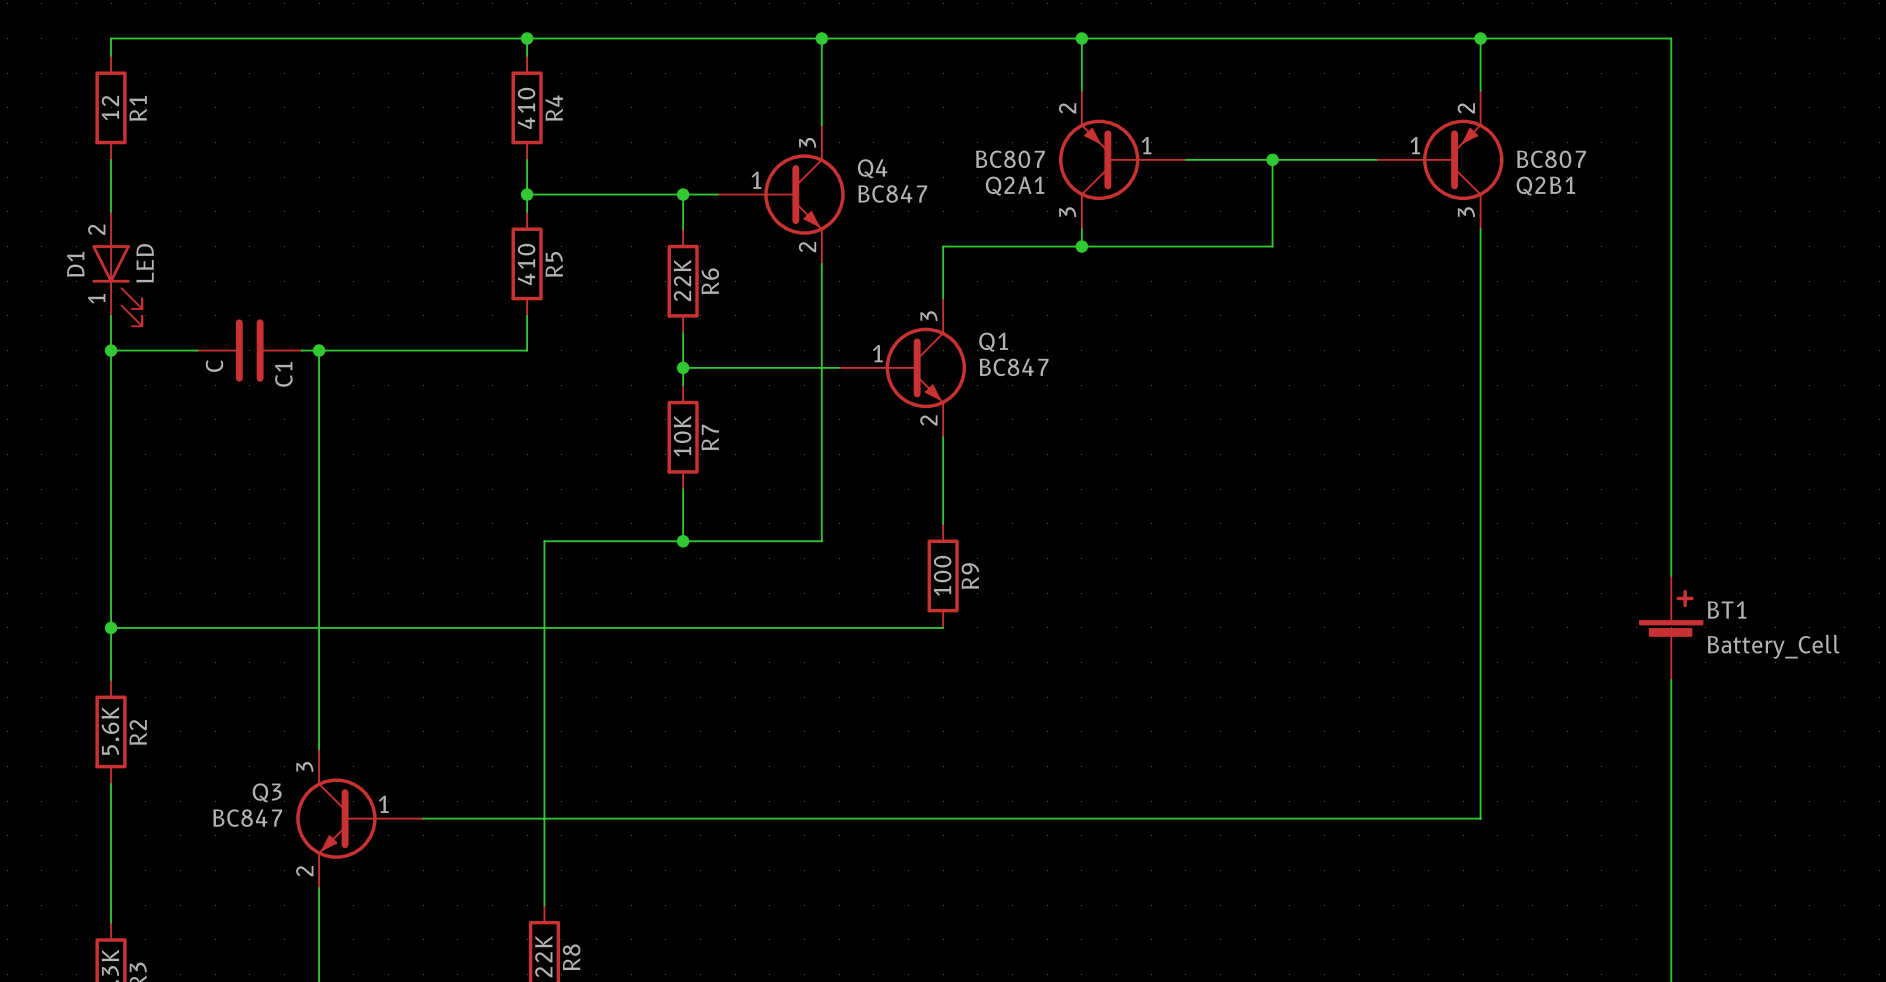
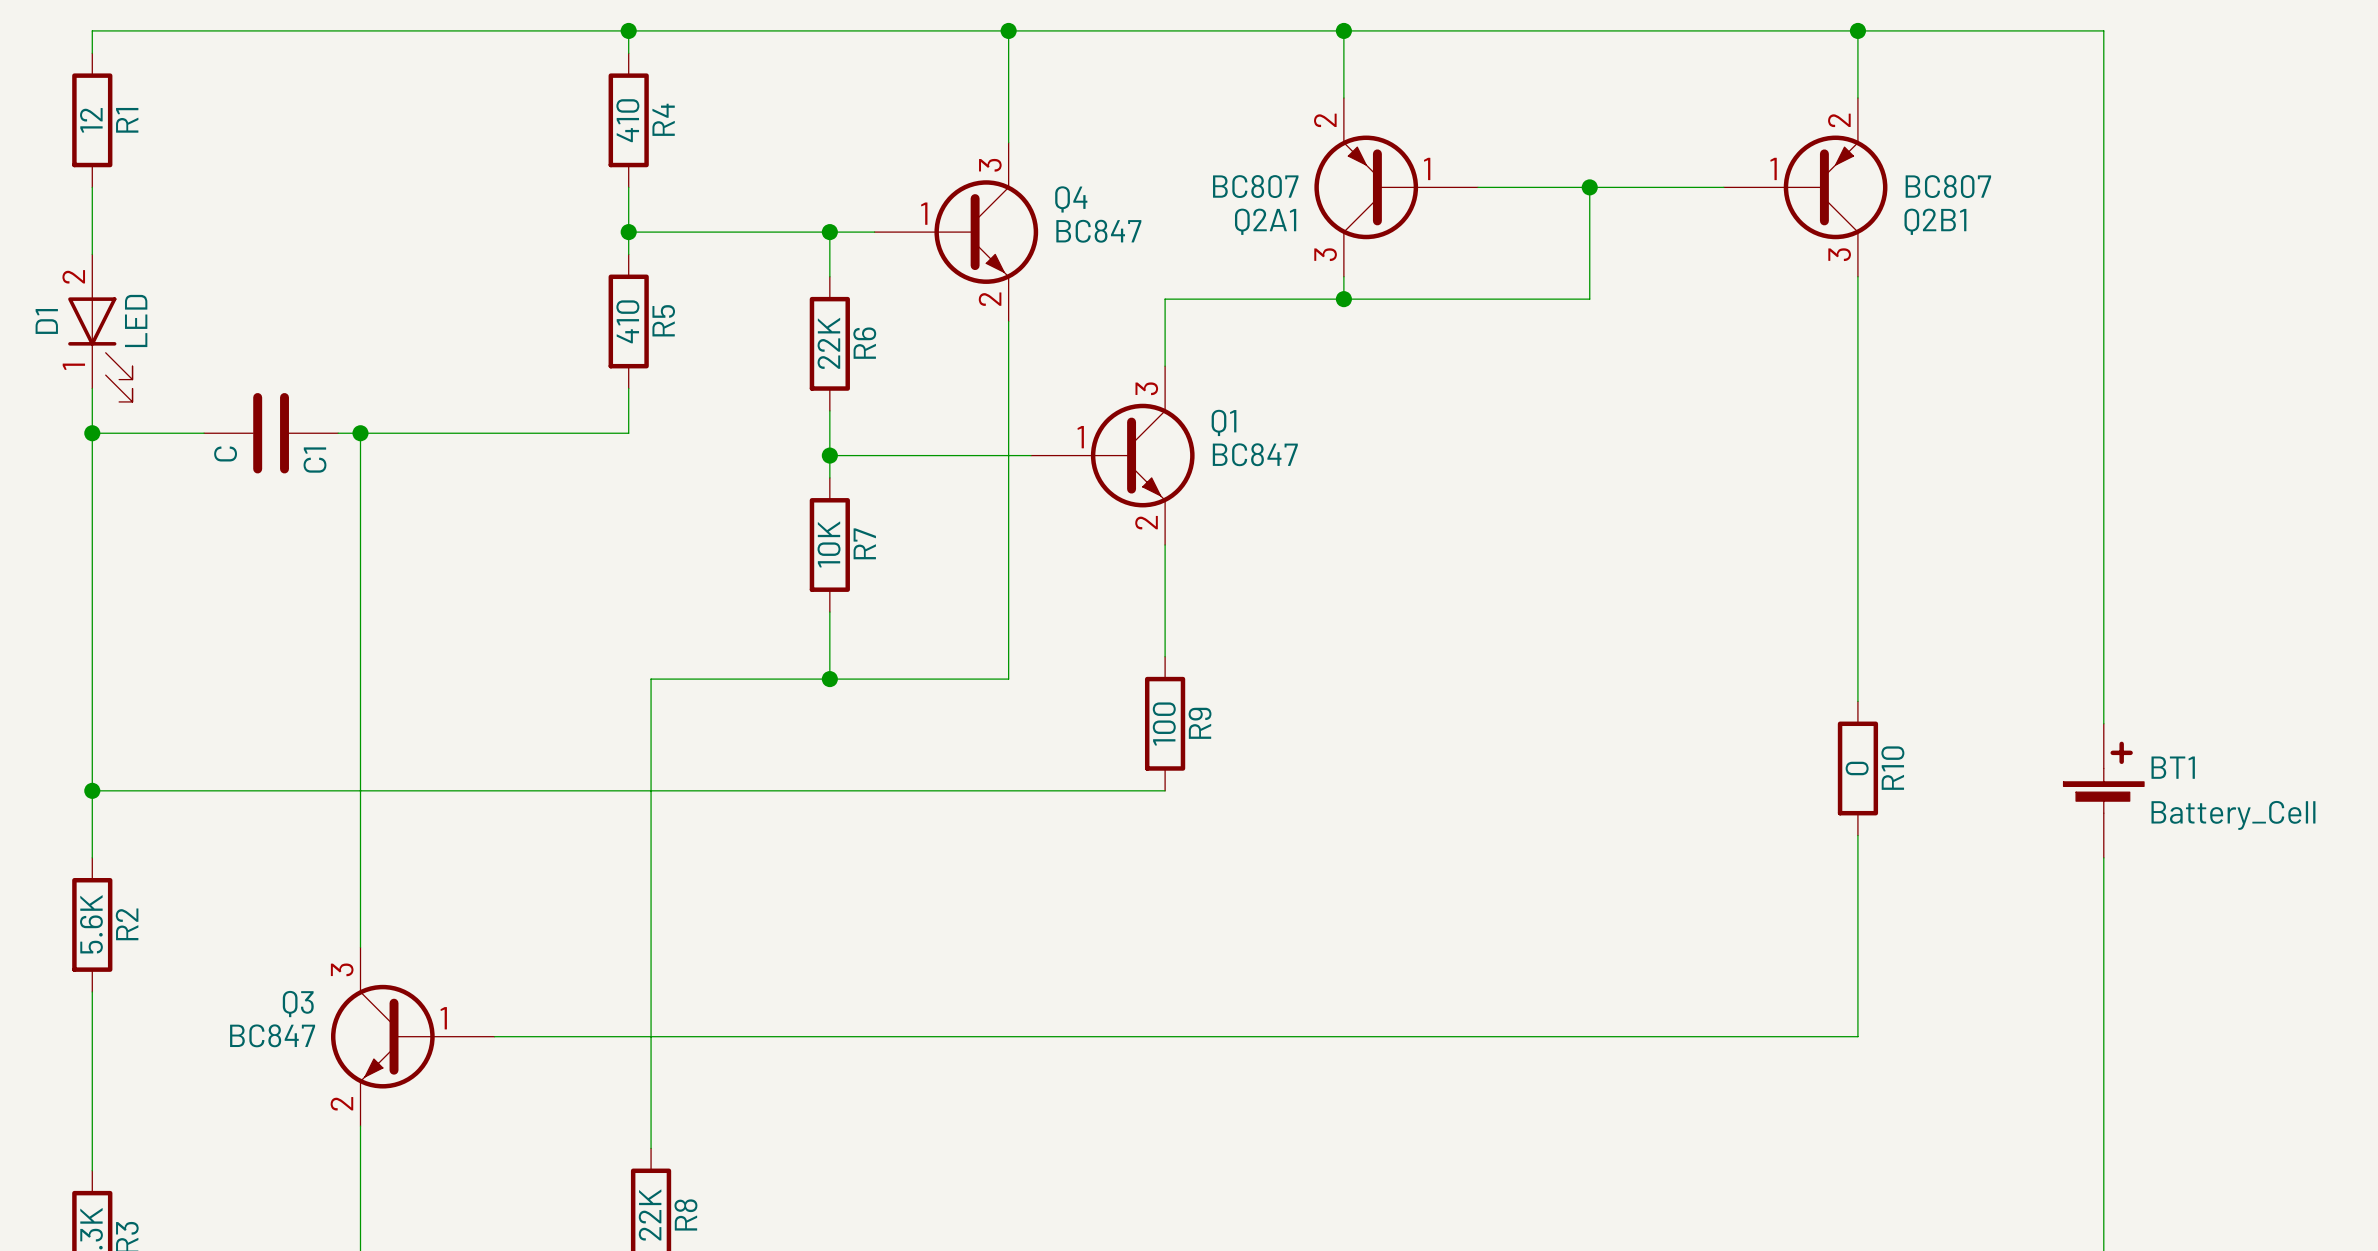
wire: (1480, 558) (1480, 662) -> none
R10: none -> 0 (1857, 768)

